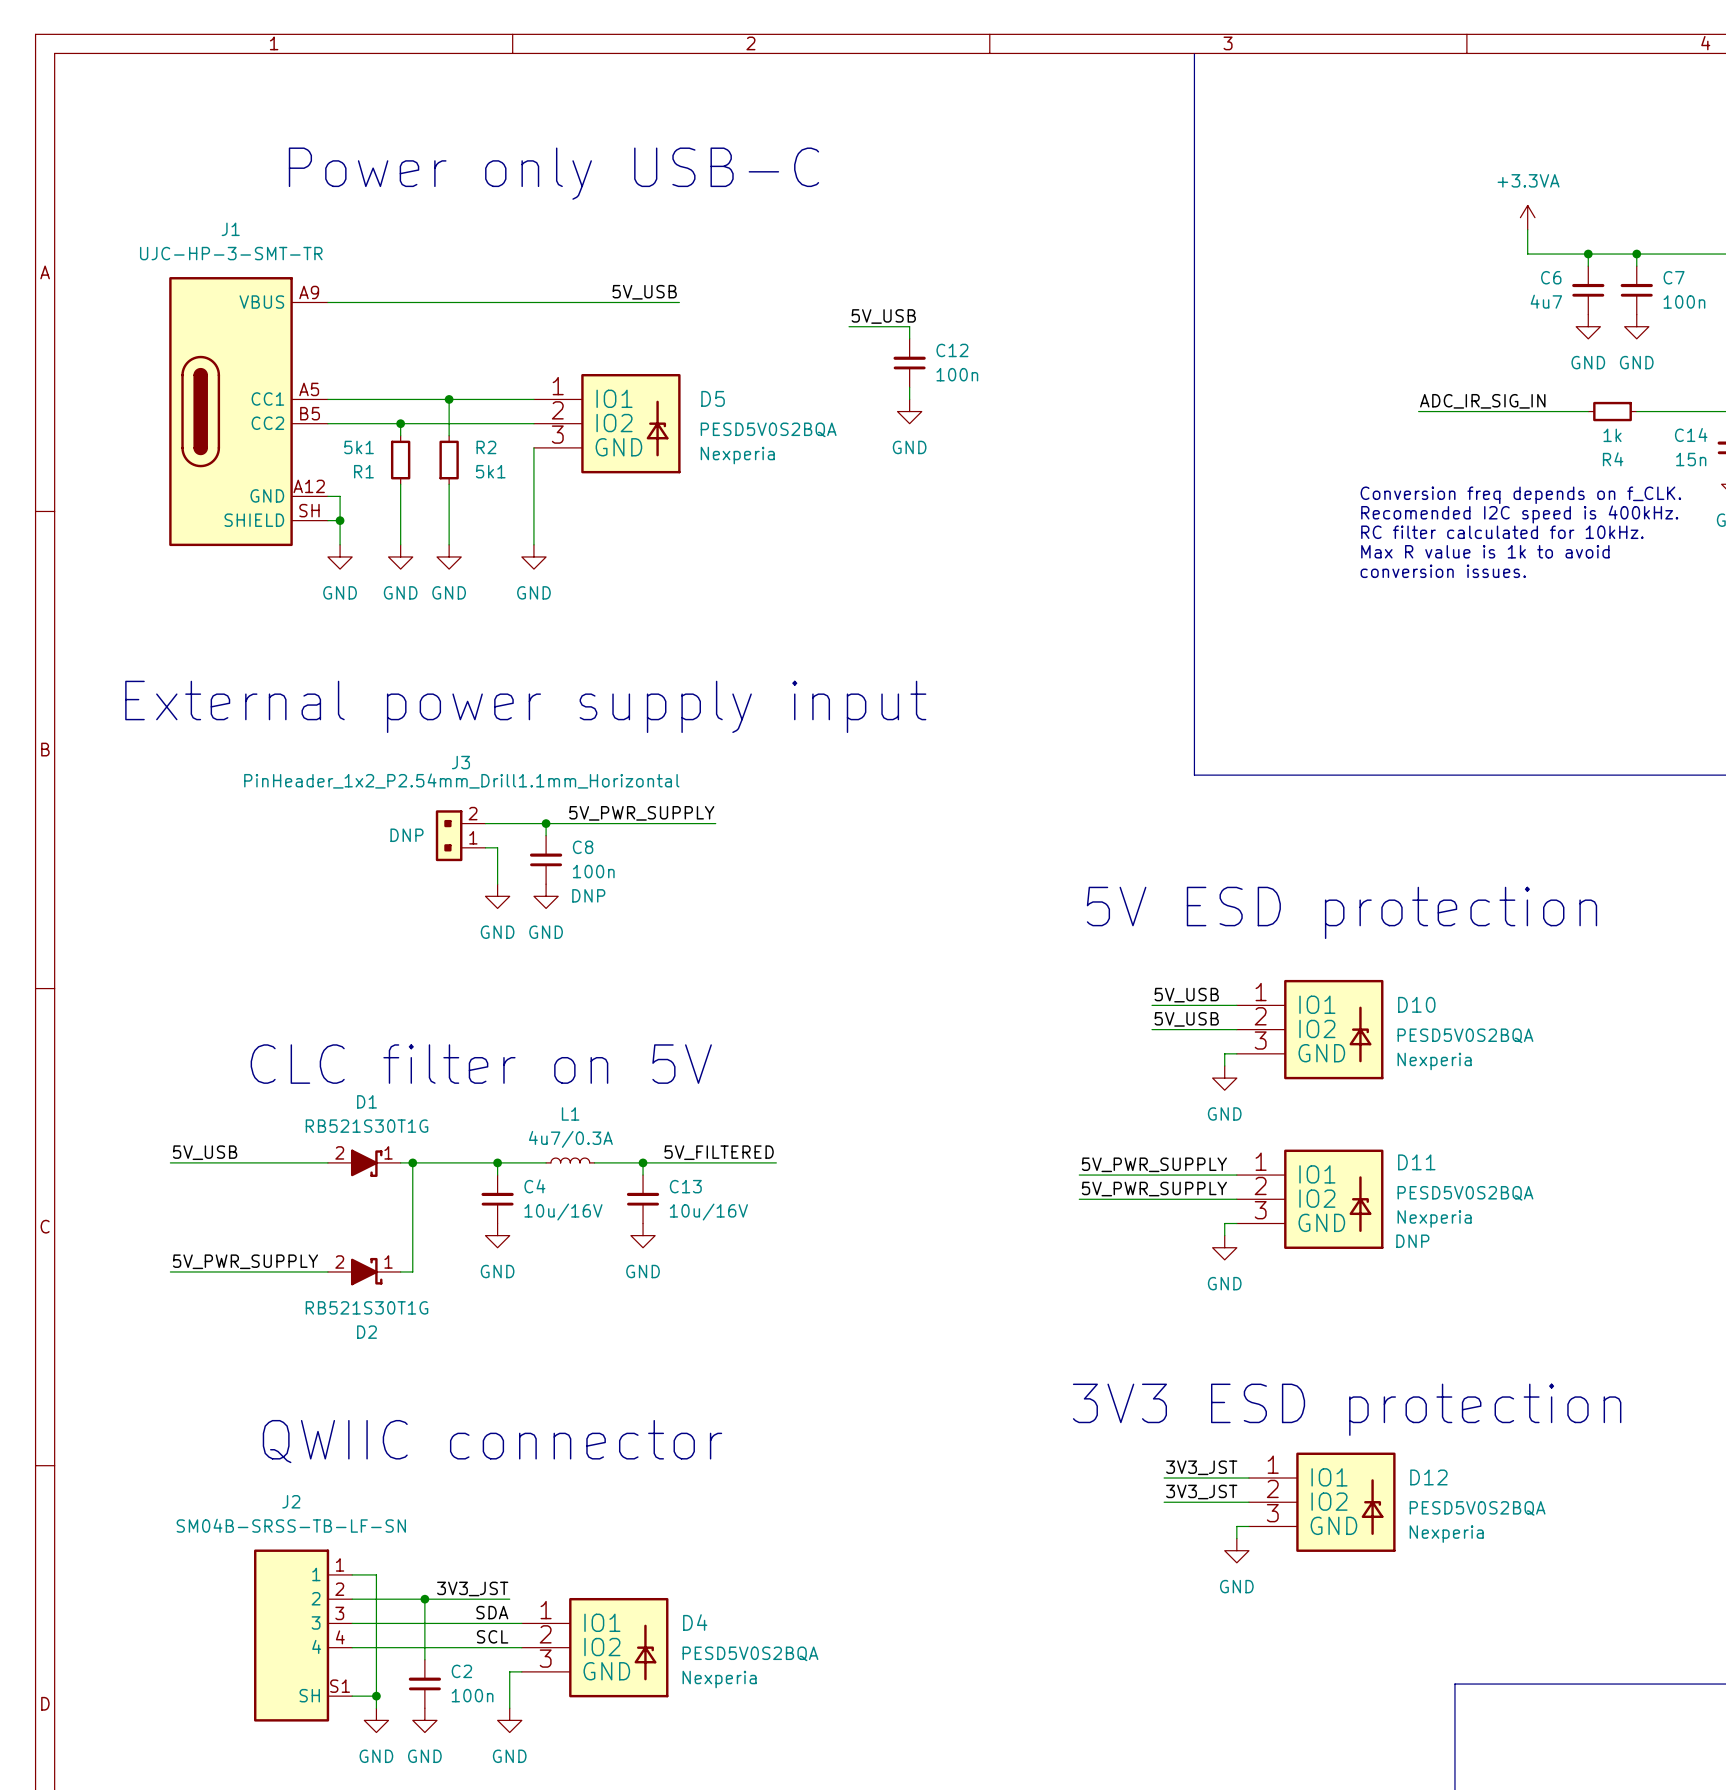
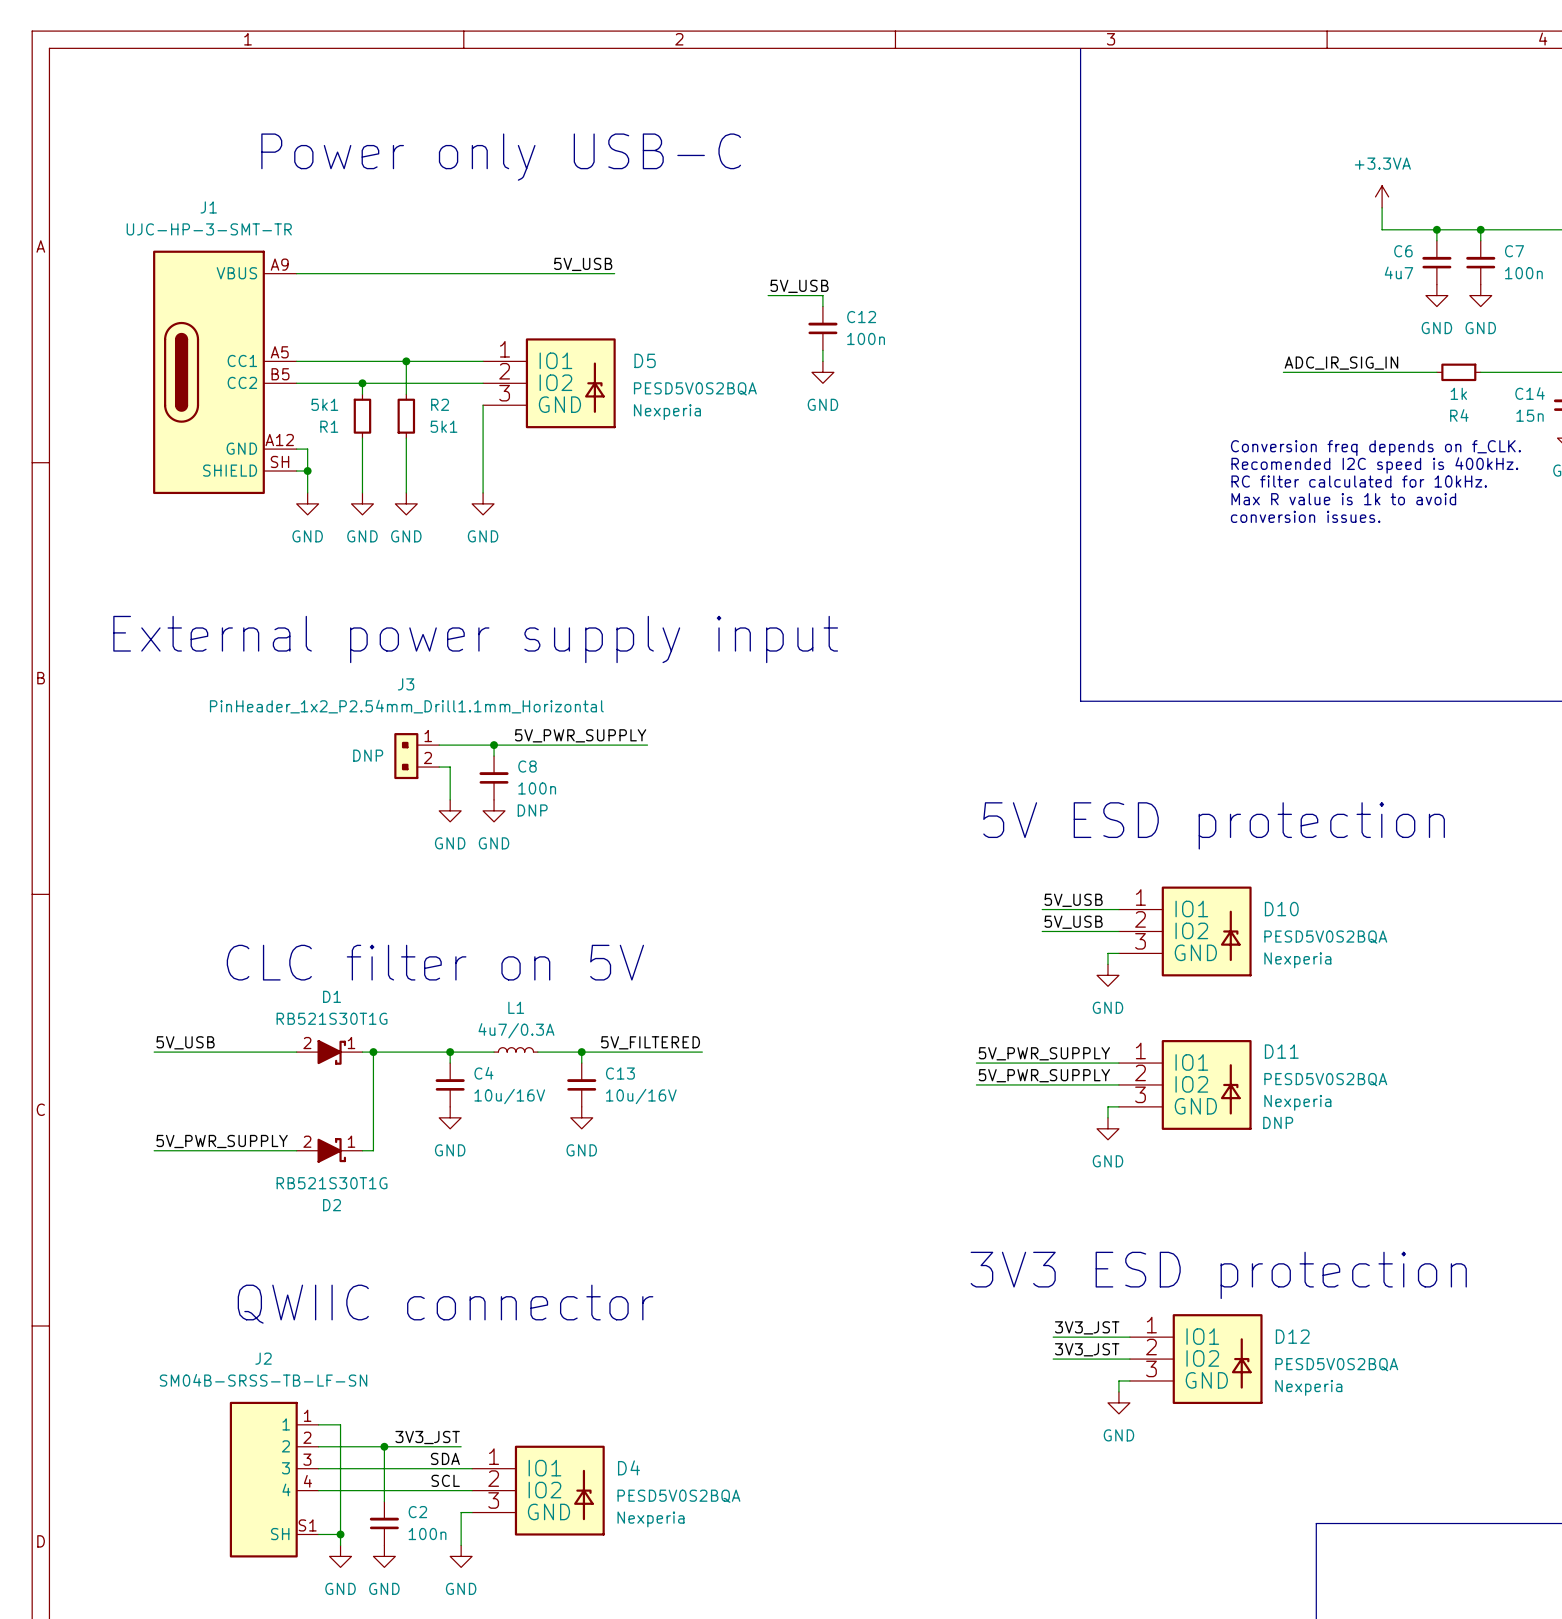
J3 flip: as is (449, 835) -> up-down (406, 756)

